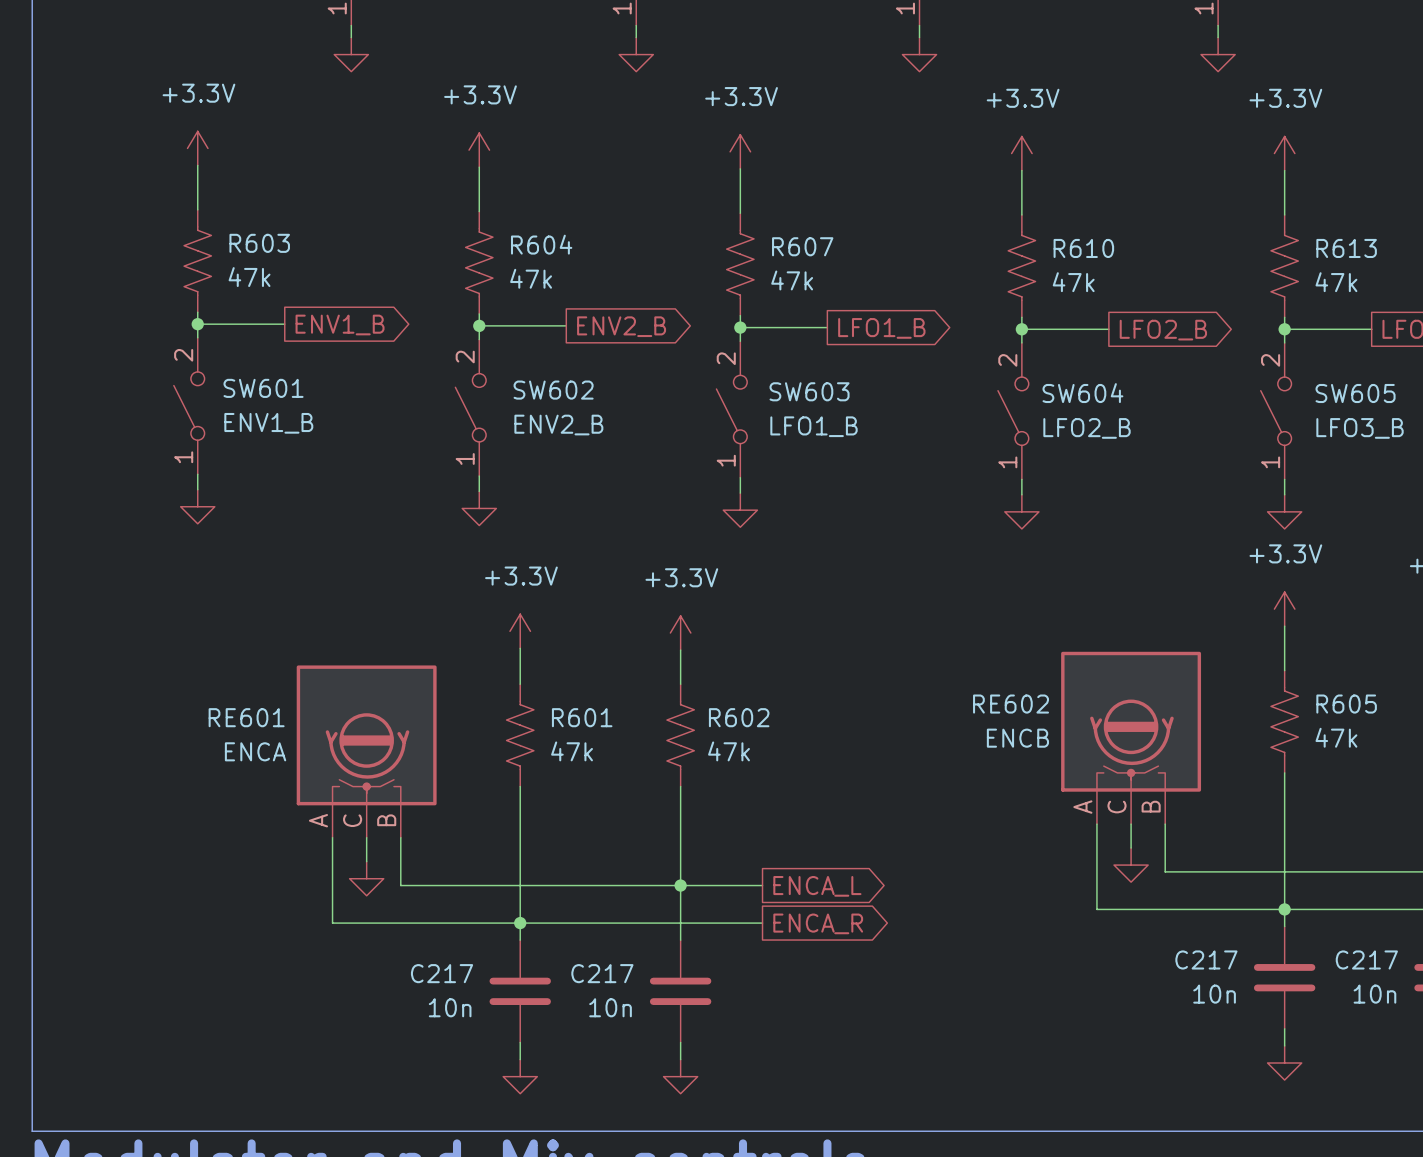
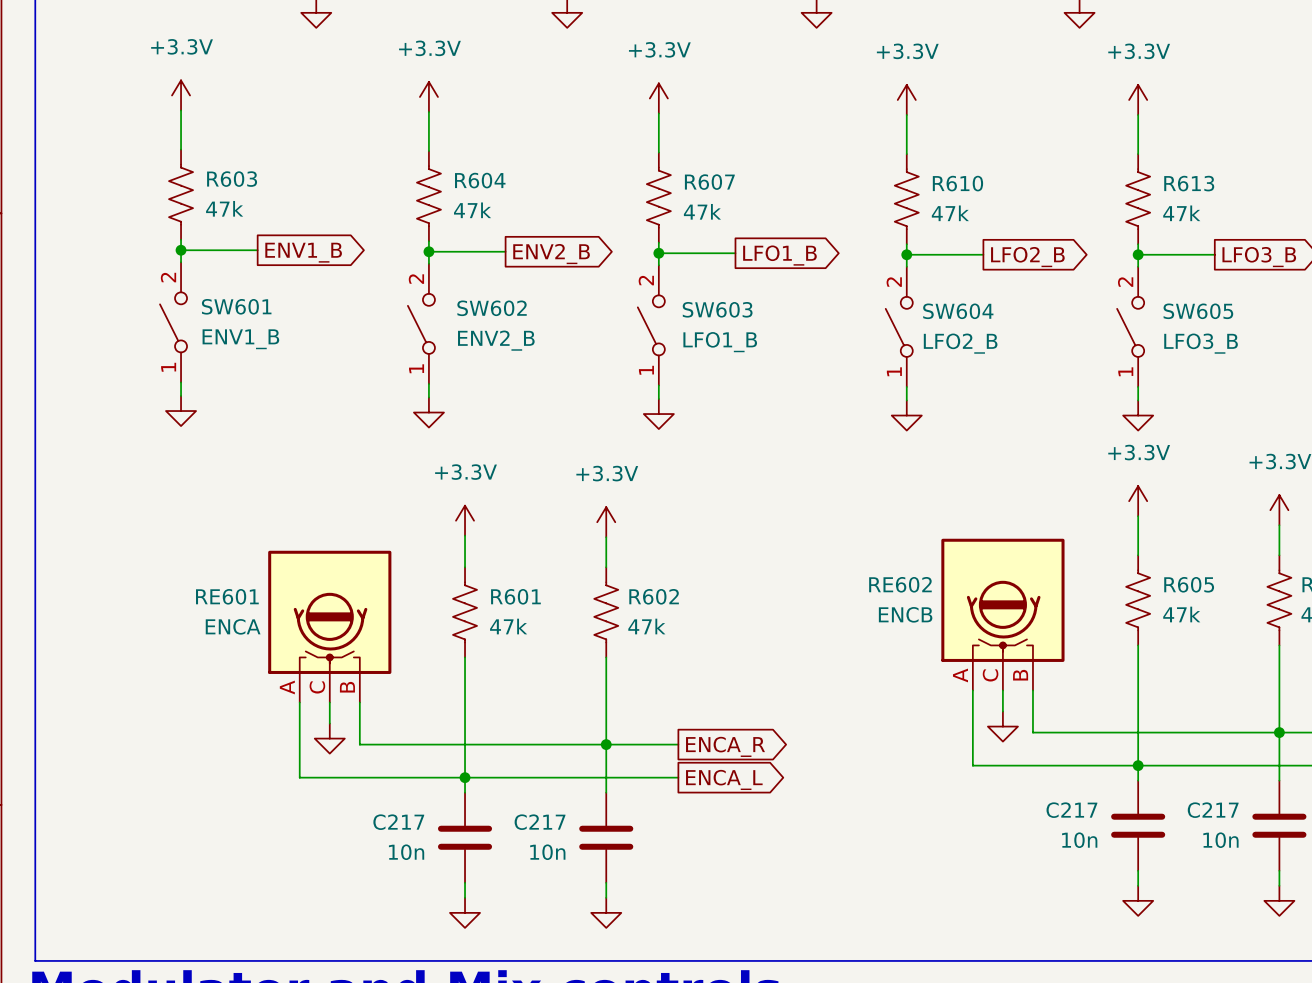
global label: ENCA_L (817, 886) -> ENCA_R (725, 746)
global label: ENCA_R (818, 923) -> ENCA_L (724, 779)

